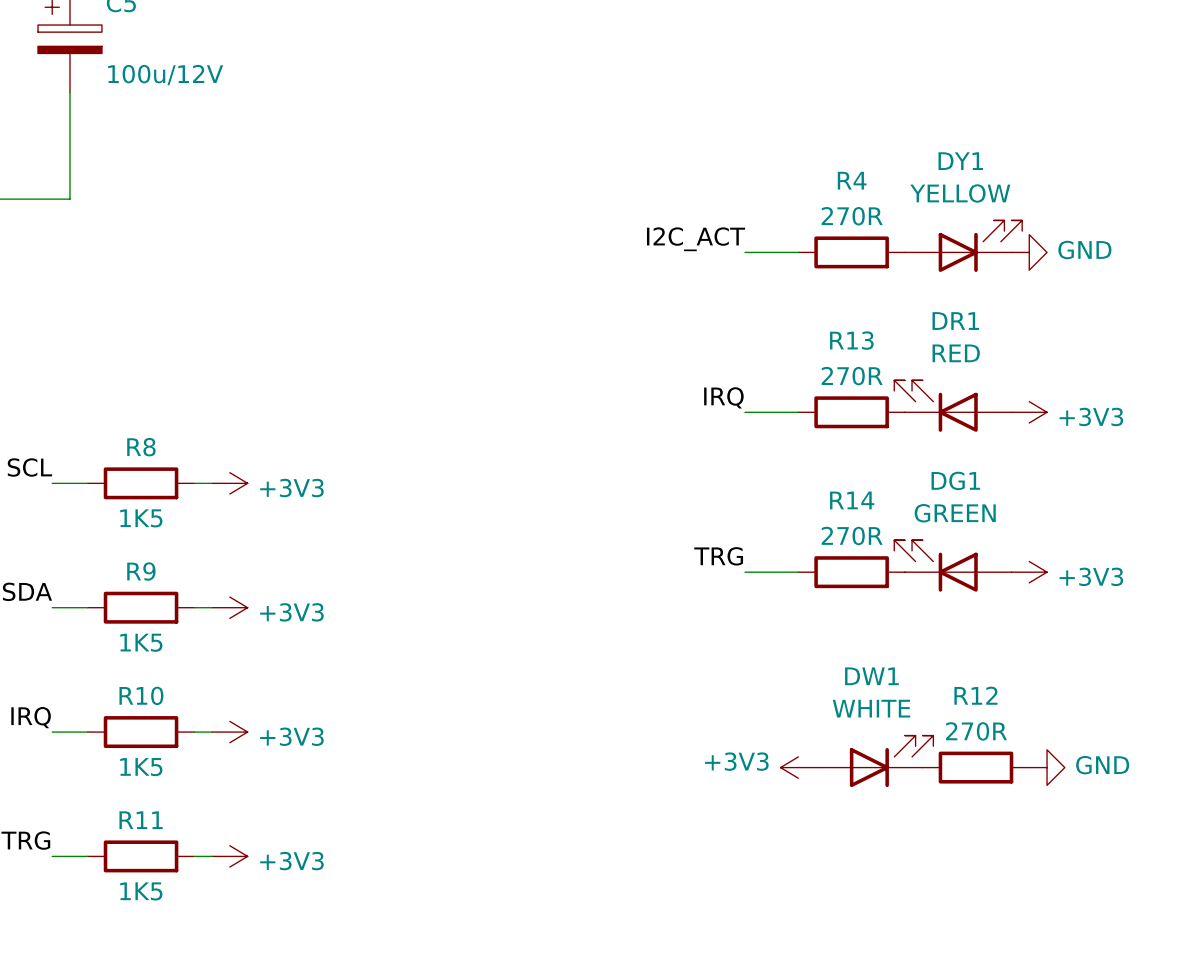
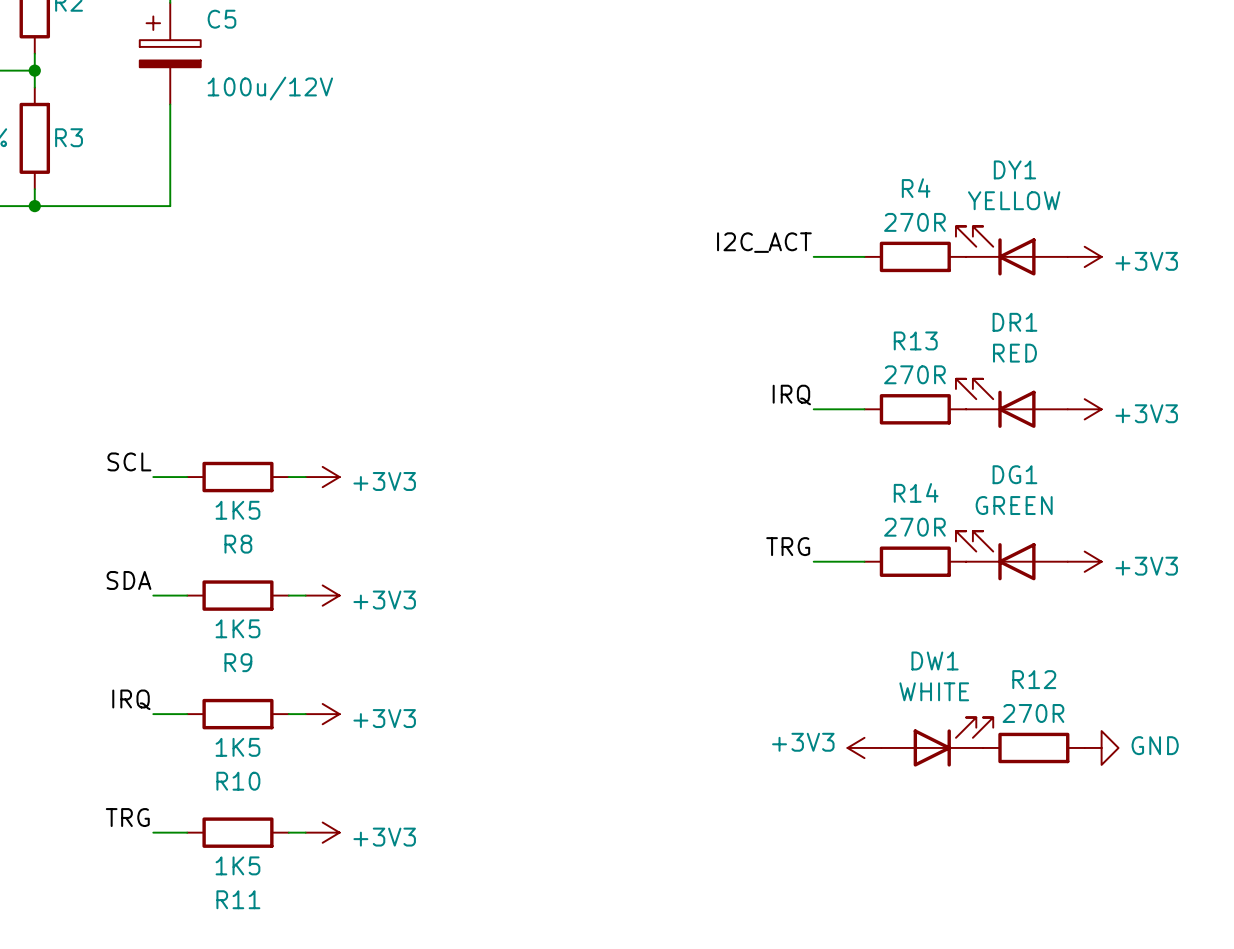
DY1 flip: as is (980, 246) -> left-right (995, 250)
power symbol: GND (1029, 252) -> +3V3 (1084, 256)
R8 name position: R8 (141, 447) -> R8 (238, 544)
R9 name position: R9 (141, 571) -> R9 (238, 662)
R10 name position: R10 (141, 695) -> R10 (238, 781)
R11 name position: R11 (141, 820) -> R11 (238, 899)

